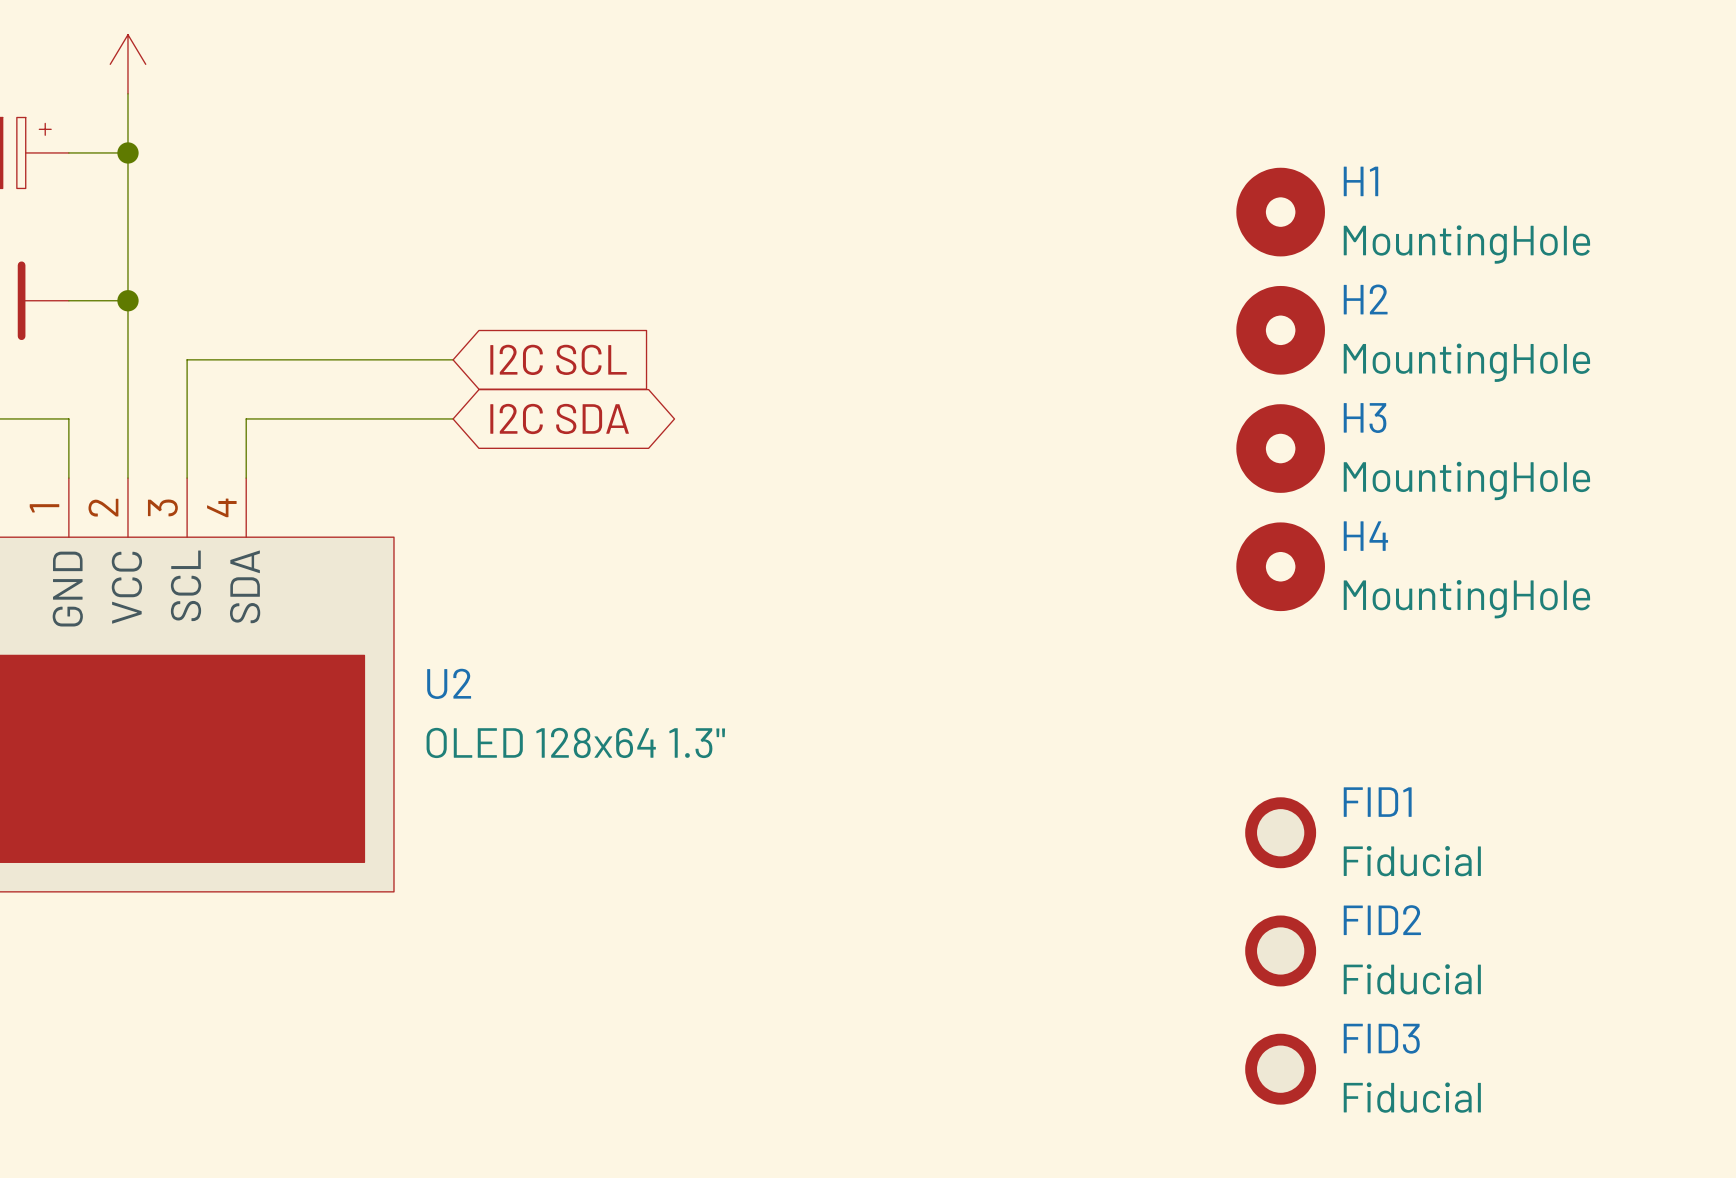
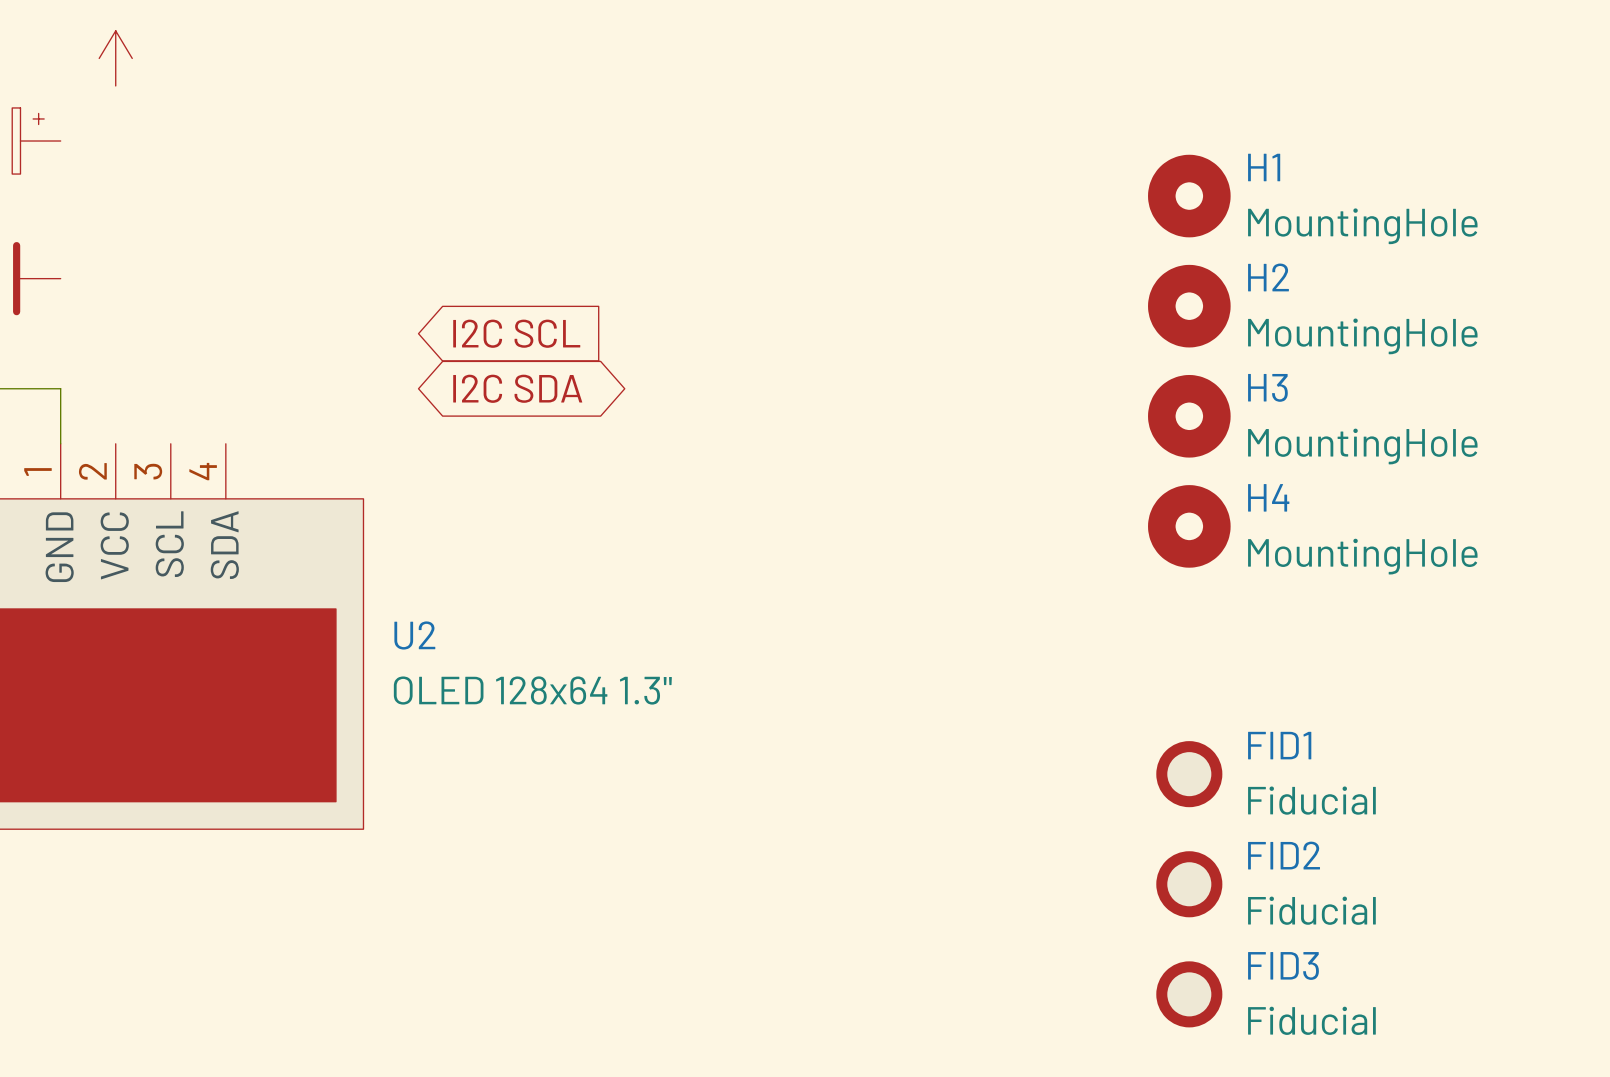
wire: (127, 93) (127, 478) -> none
wire: (68, 152) (127, 152) -> none
junction: (127, 152) -> none
wire: (68, 300) (127, 300) -> none
junction: (127, 300) -> none
wire: (453, 359) (187, 359) (187, 478) -> none
wire: (453, 418) (246, 418) (246, 478) -> none

